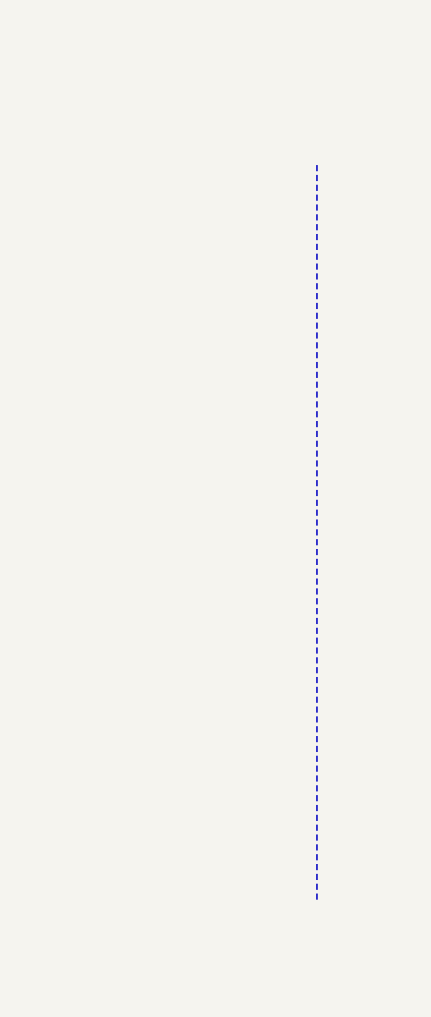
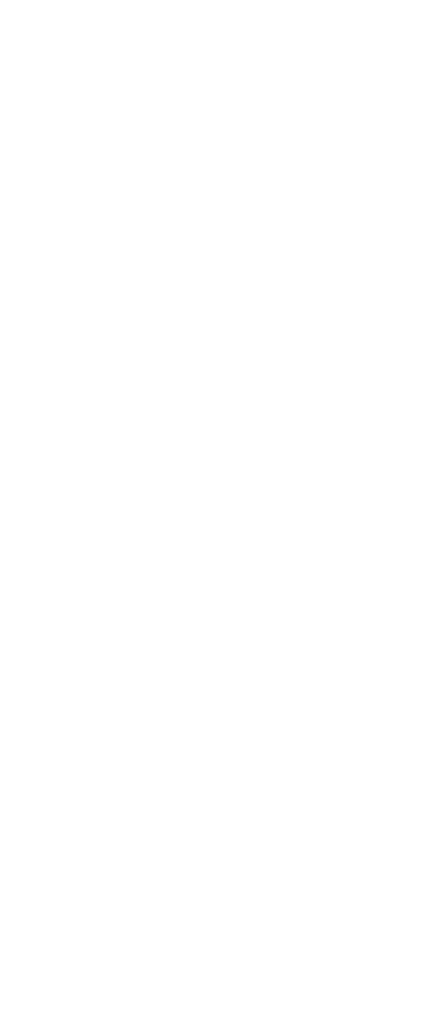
line: (316, 165) (316, 903) -> none

